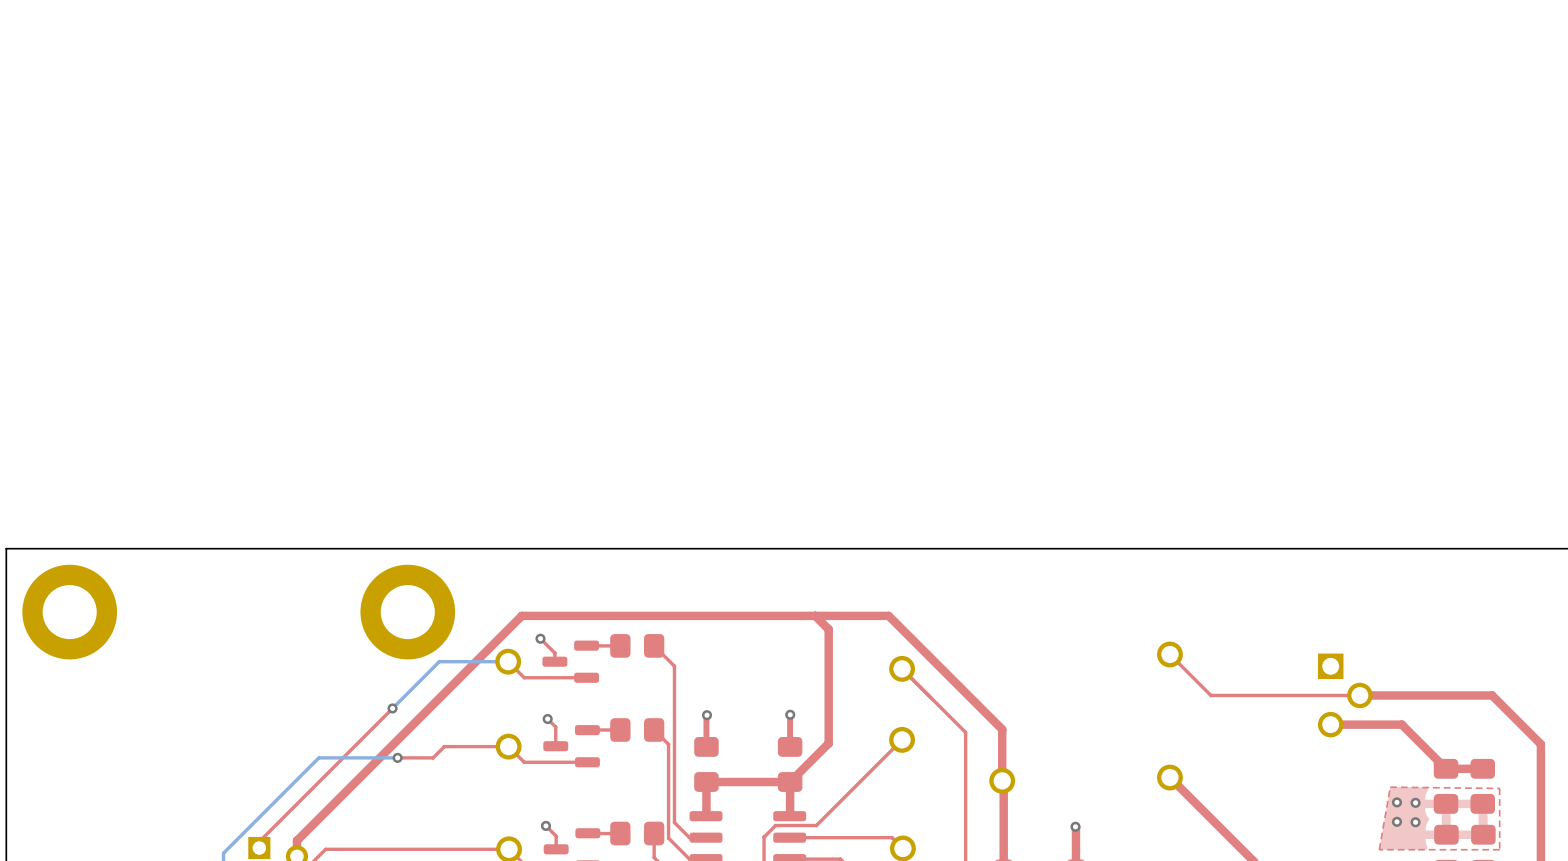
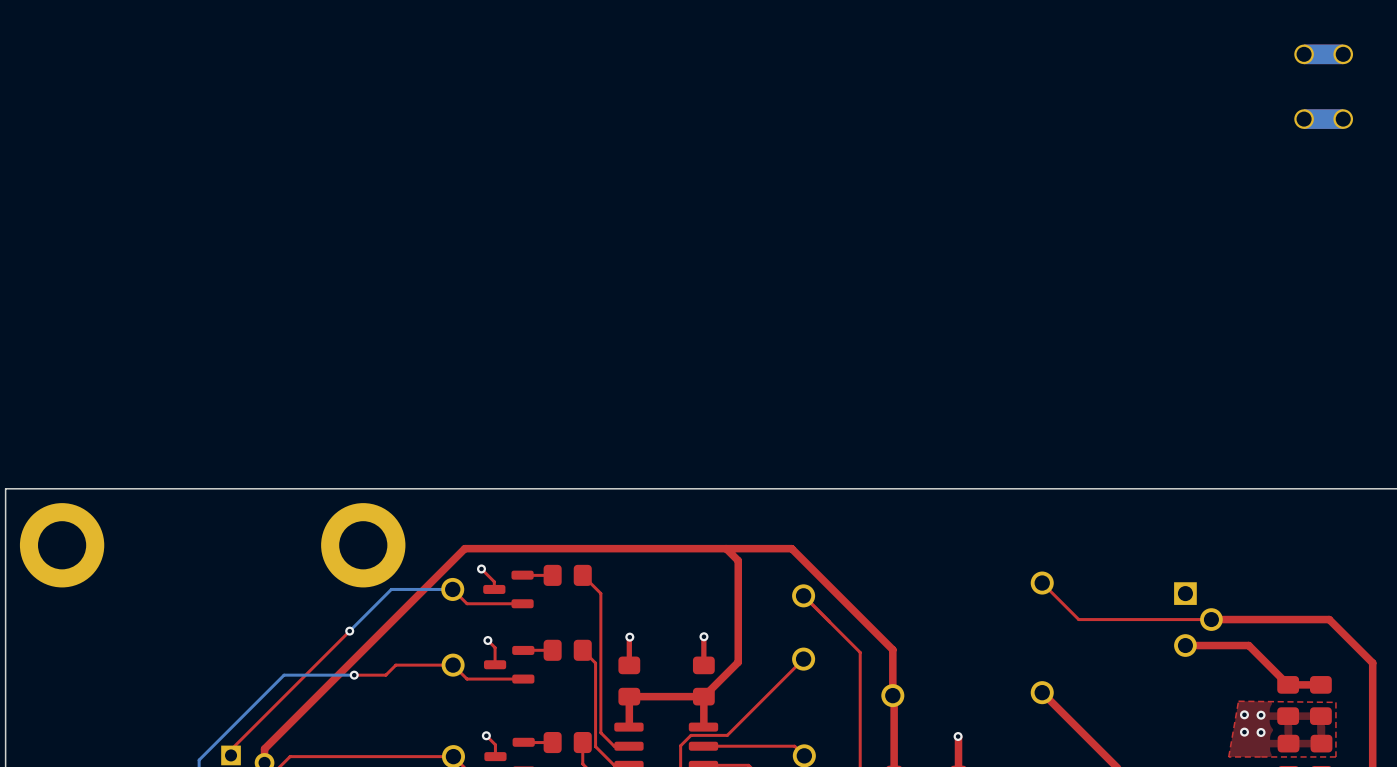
part: none -> (1323, 54)
part: none -> (1323, 119)

